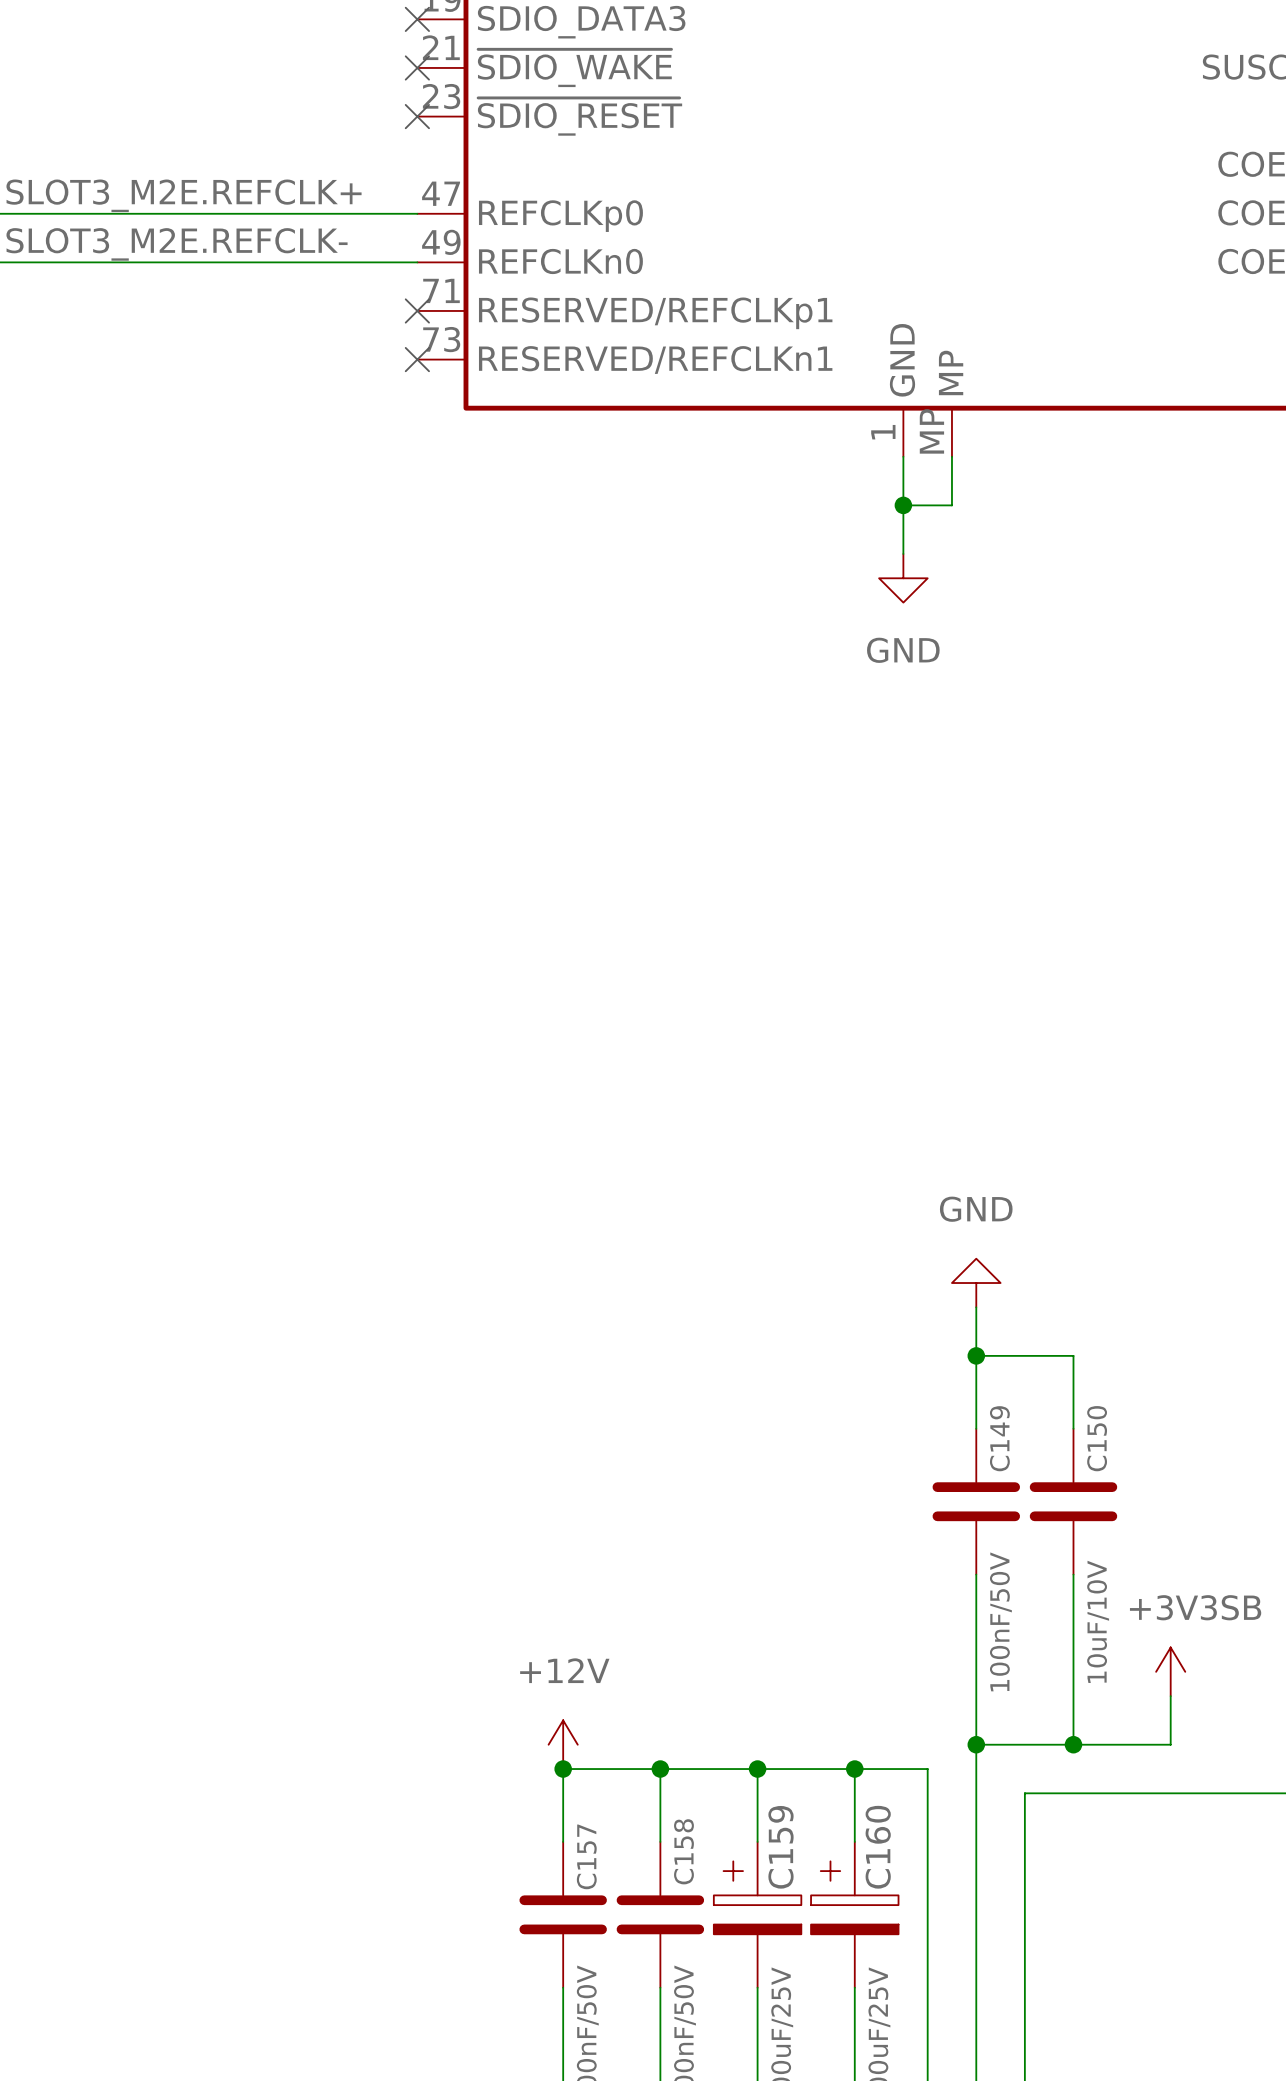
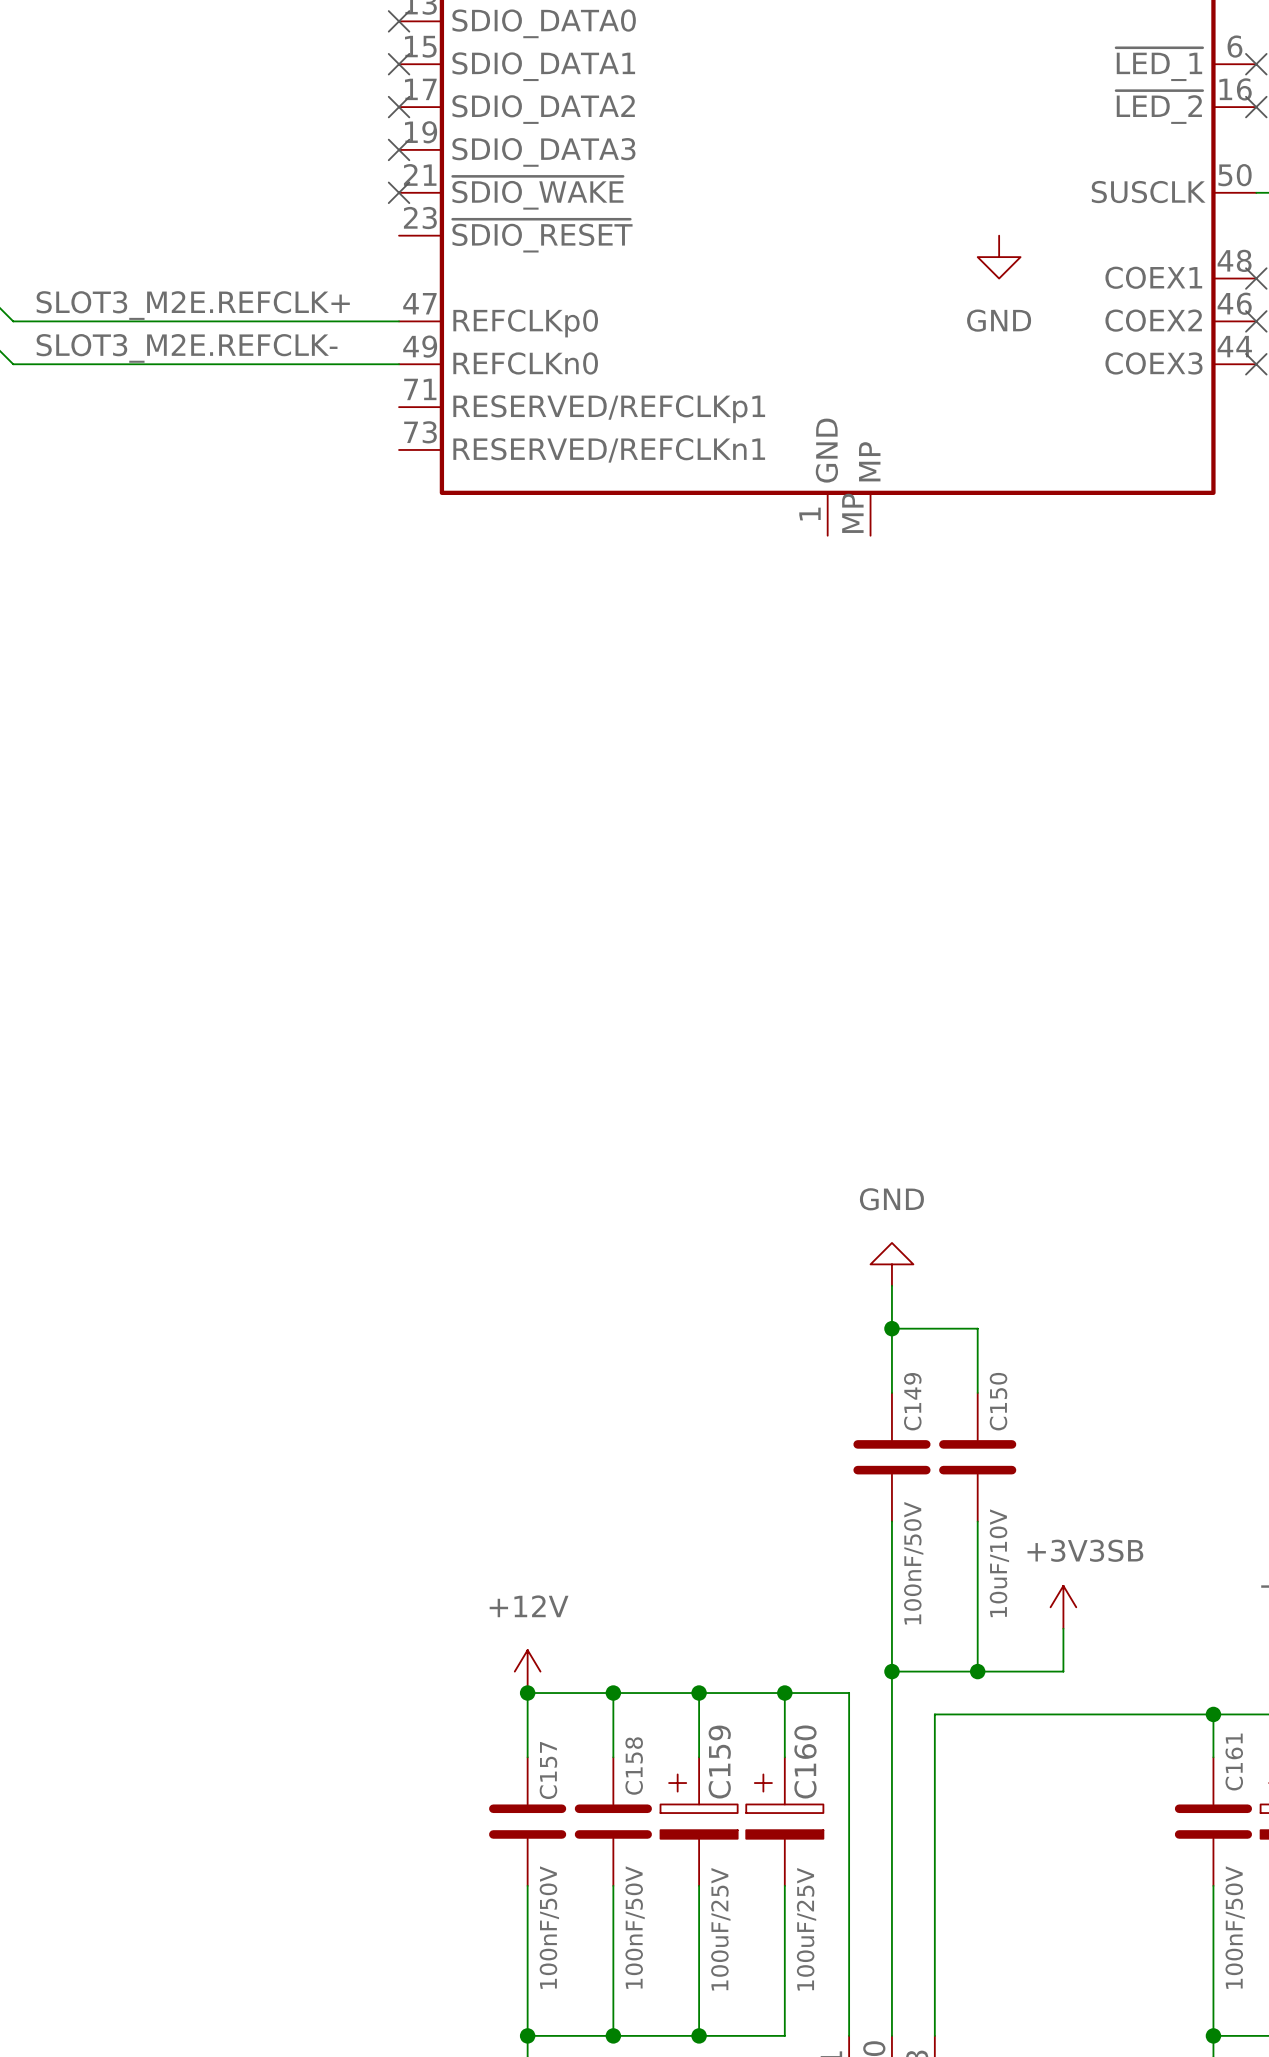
no-connect mark: (417, 116) -> none
power symbol: none -> GND (999, 257)
no-connect mark: (417, 310) -> none
no-connect mark: (417, 359) -> none
wire: (903, 456) (903, 553) -> none
wire: (951, 456) (951, 505) (903, 505) -> none
junction: (903, 505) -> none
power symbol: GND (903, 578) -> none

